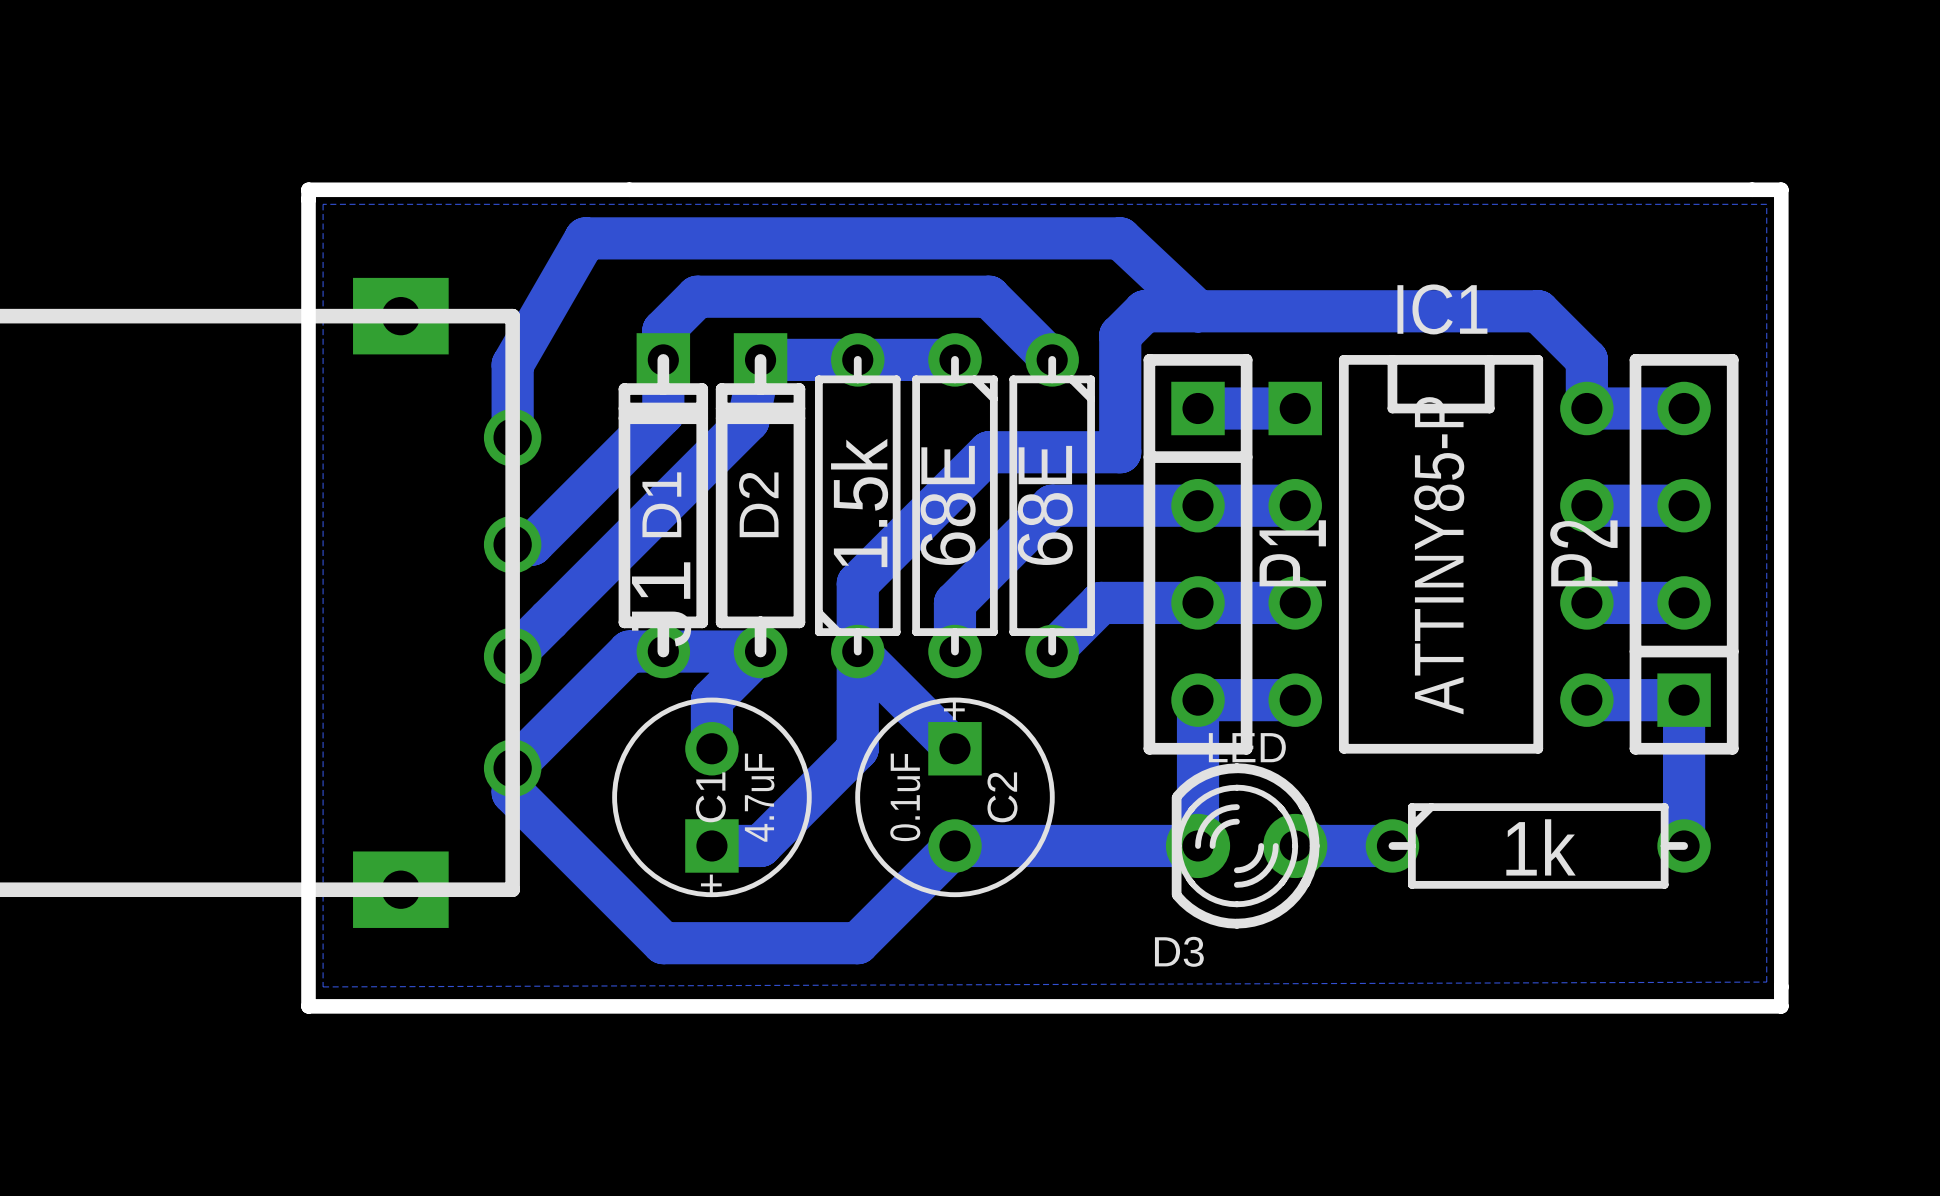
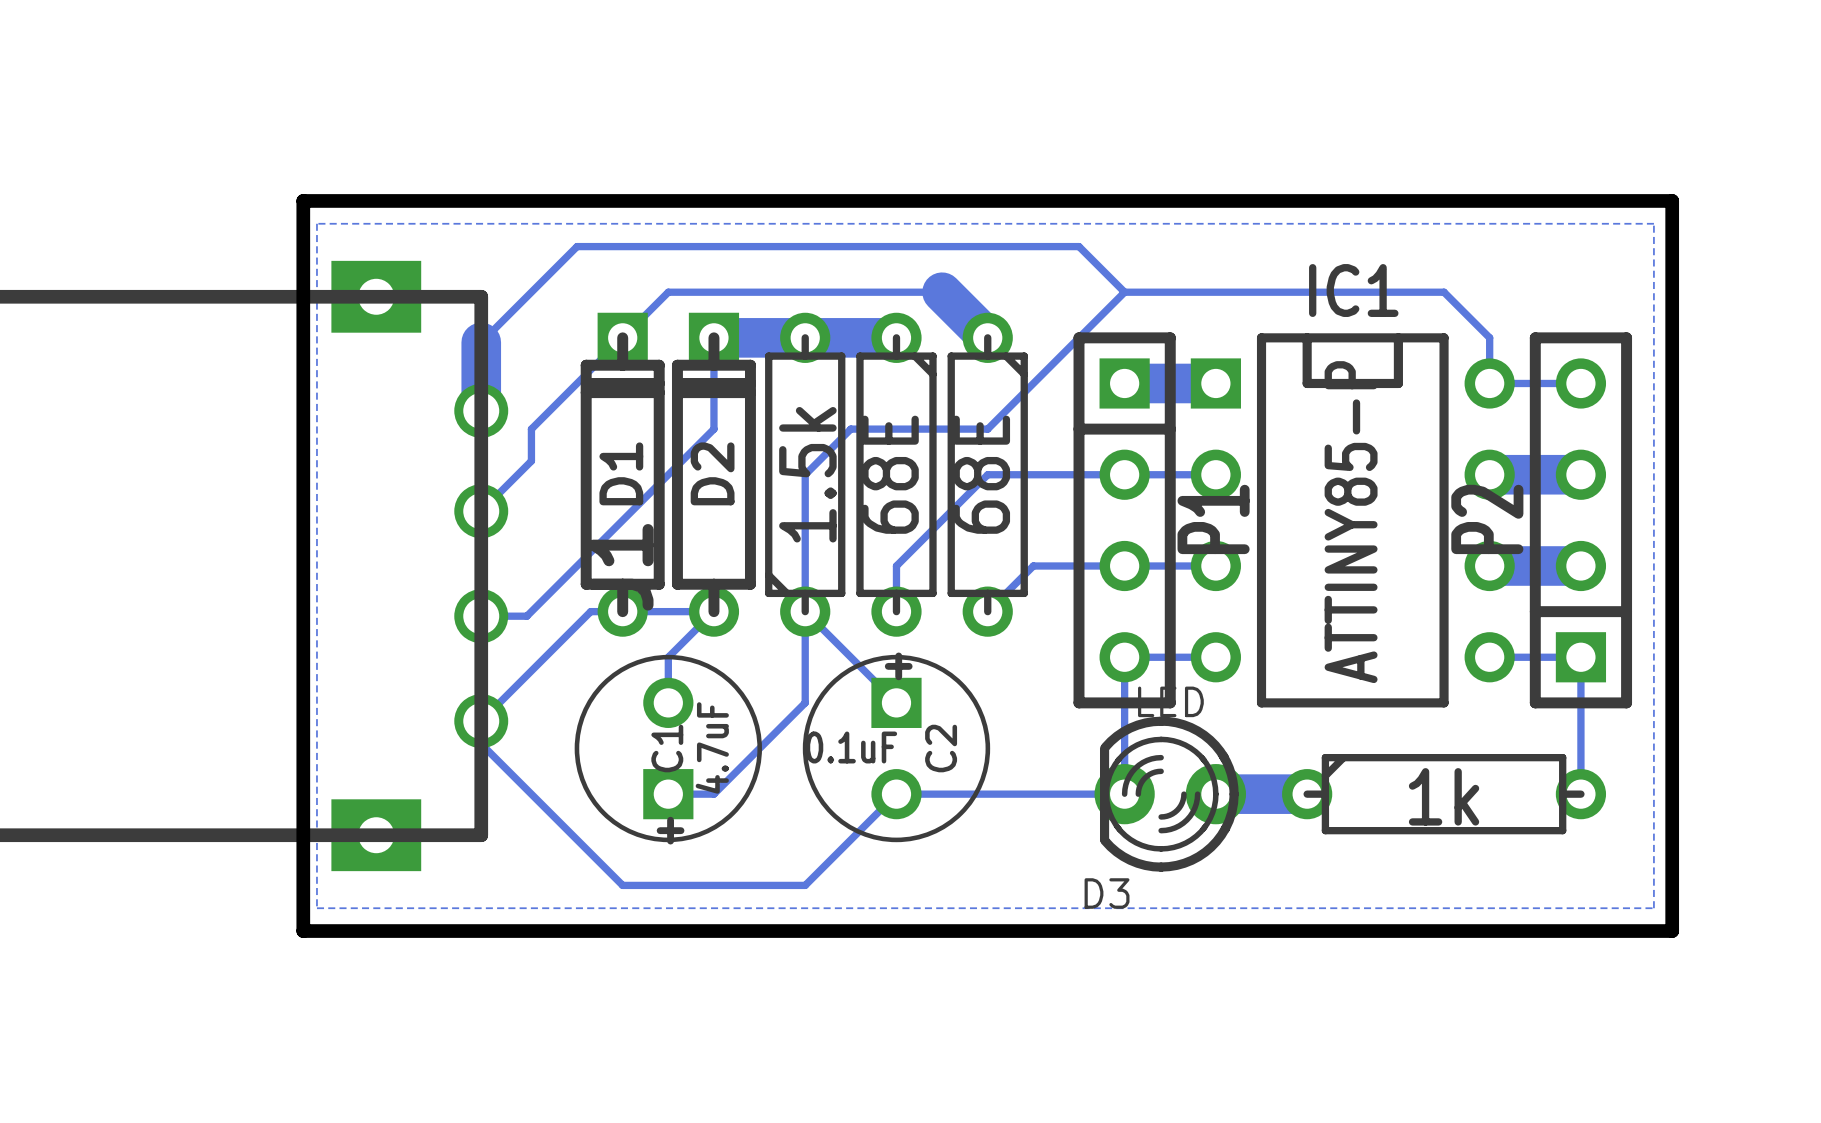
bottom zone outline: (323, 204) (1766, 204) (1766, 982) (323, 986) (323, 204) -> (316, 223) (316, 908) (1653, 908) (1653, 223) (316, 223)
board edge: (1781, 214) (1781, 189) (308, 189) (308, 1006) (1781, 1006) (1781, 991) -> (1672, 200) (303, 200) (303, 931) (1672, 931)
bottom track: (1003, 311) (989, 296) (697, 296) (663, 330) (663, 413) (532, 544) (512, 544) -> (942, 292) (668, 292) (531, 429) (531, 461) (481, 511)
bottom track width: thick (1198, 311) (1538, 311) (1586, 359) (1586, 408) (1684, 408) -> thin (1124, 292) (1444, 292) (1489, 337) (1489, 383) (1580, 383)
bottom track: (760, 359) (748, 420) (512, 656) -> (713, 337) (713, 429) (526, 616) (481, 616)
bottom track: (512, 364) (585, 238) (1120, 238) (1198, 311) (1144, 311) (1120, 335) (1120, 452) (989, 452) (857, 583) -> (481, 342) (577, 246) (1079, 246) (1124, 292) (987, 429) (850, 429) (805, 474) (805, 547)
bottom track width: thick (1295, 505) (1052, 505) (954, 602) (954, 651) -> thin (1215, 474) (987, 474) (896, 566) (896, 611)
bottom track width: thick (857, 583) (857, 748) (760, 845) (711, 845) -> thin (805, 547) (805, 702) (713, 794) (668, 794)
bottom track width: thick (1295, 602) (1100, 602) (1052, 651) -> thin (1215, 566) (1033, 566) (987, 611)
bottom track width: thick (857, 651) (954, 748) -> thin (805, 611) (896, 702)
bottom track width: thick (1295, 700) (1198, 700) (1198, 845) (954, 845) (857, 943) (663, 943) (512, 792) (512, 768) (629, 651) (760, 651) (711, 700) (711, 748) -> thin (1215, 657) (1124, 657) (1124, 794) (896, 794) (805, 885) (622, 885) (481, 743) (481, 721) (590, 611) (713, 611) (668, 657) (668, 702)
bottom track width: thick (1586, 700) (1684, 700) (1684, 845) -> thin (1489, 657) (1580, 657) (1580, 794)
C2 value rotation: 0° (905, 797) -> 90° clockwise (851, 747)

